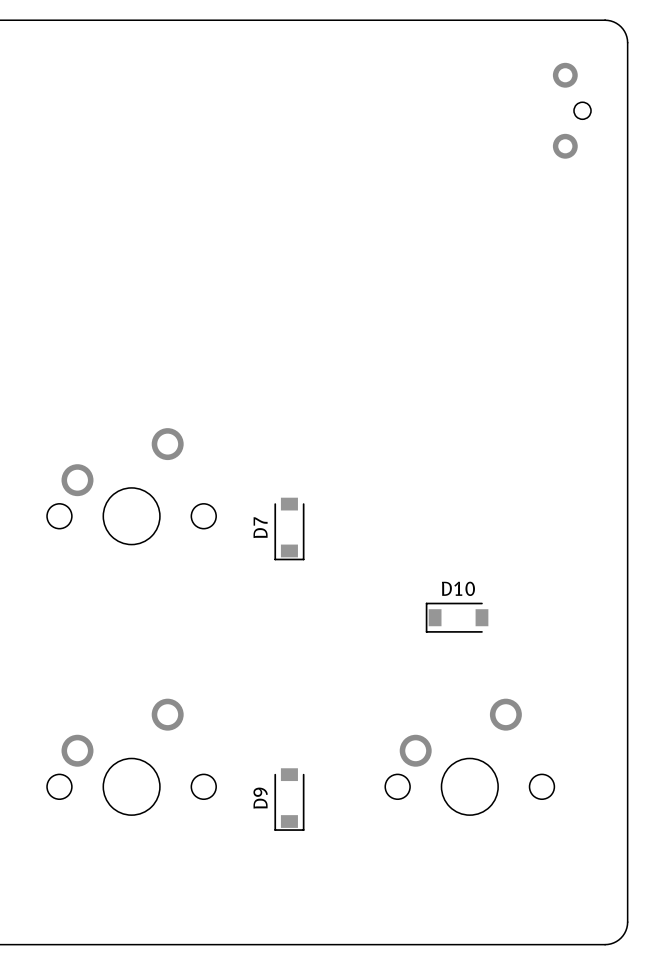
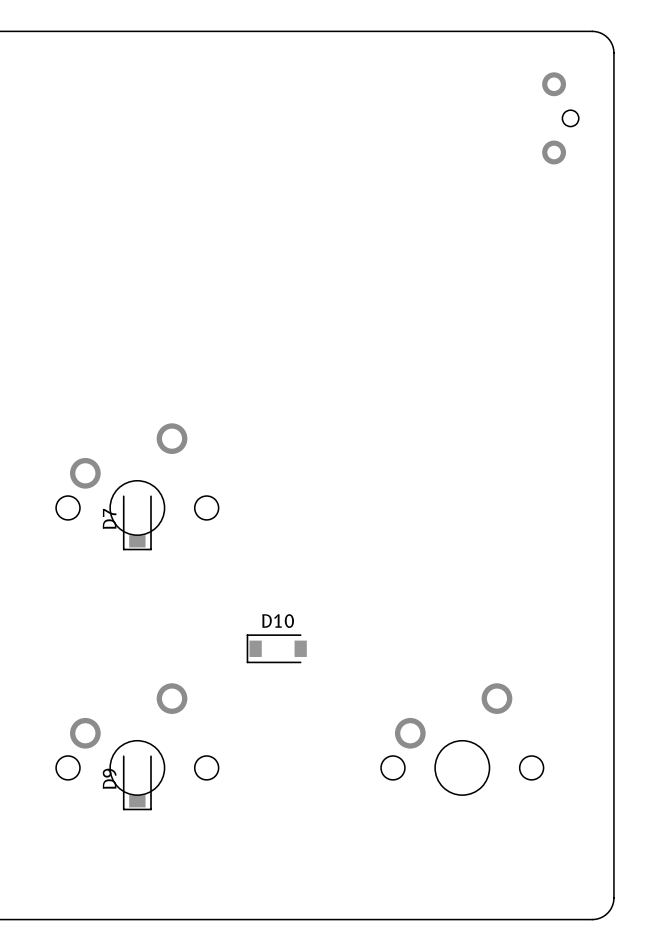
D7 position: (289, 529) -> (137, 520)
D10 position: (457, 617) -> (276, 648)
D9 position: (289, 799) -> (137, 780)

